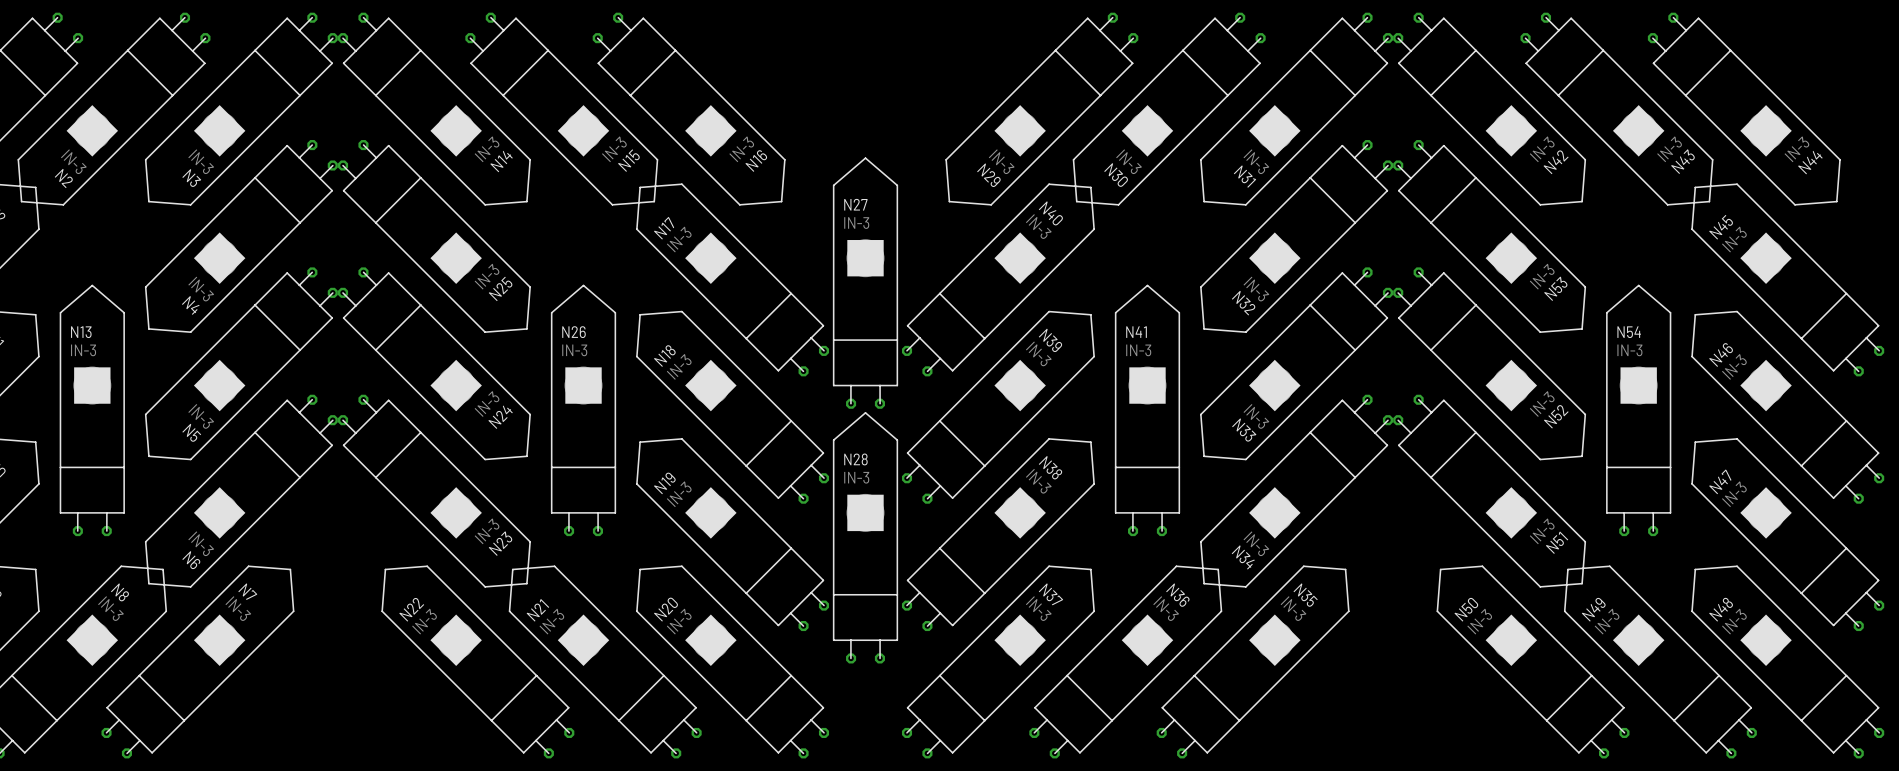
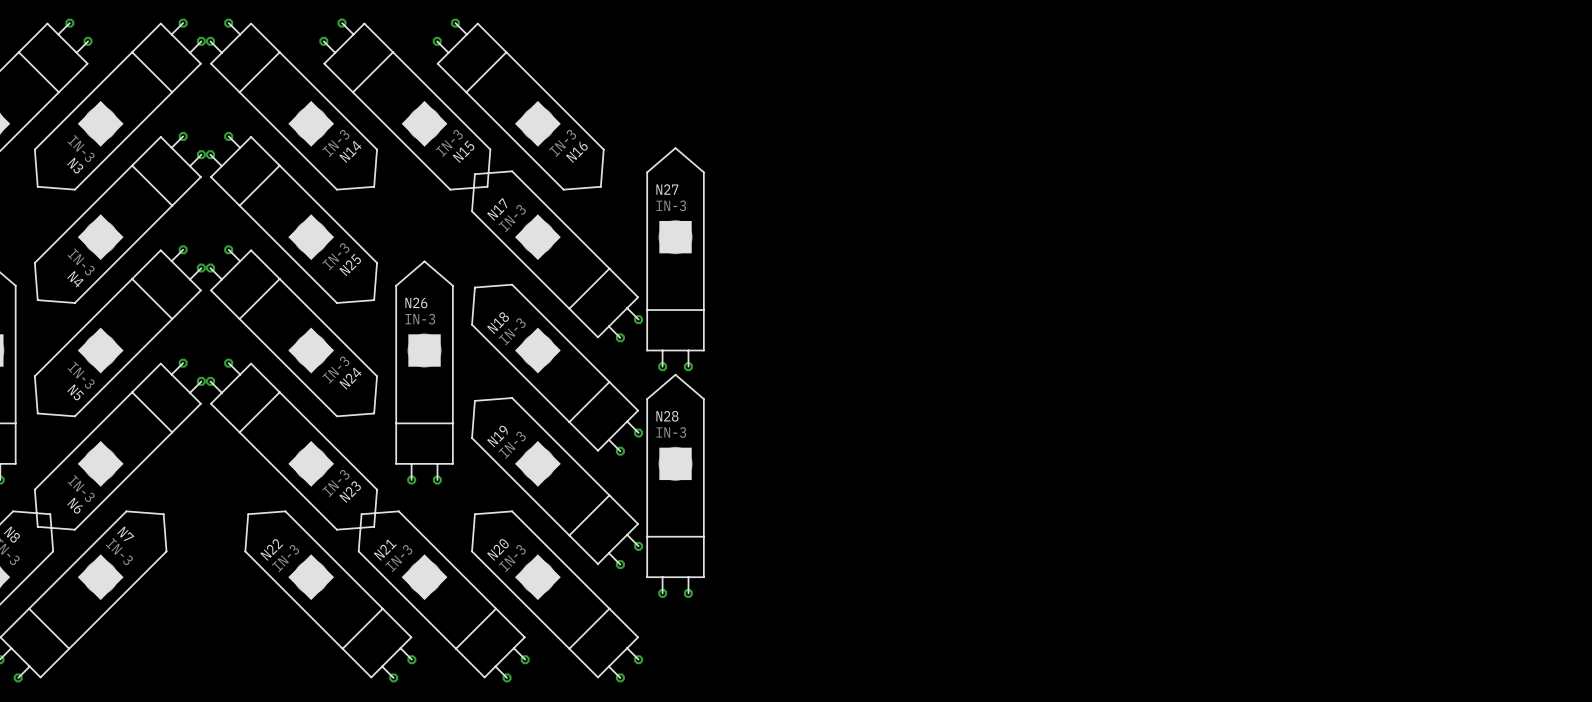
N29: IN-3 (1041, 109) -> none
N30: IN-3 (1169, 109) -> none
N31: IN-3 (1296, 109) -> none
N42: IN-3 (1489, 109) -> none
N43: IN-3 (1616, 109) -> none
N44: IN-3 (1744, 109) -> none
N32: IN-3 (1296, 236) -> none
N53: IN-3 (1489, 236) -> none
N40: IN-3 (998, 280) -> none
N45: IN-3 (1787, 280) -> none
N33: IN-3 (1296, 363) -> none
N52: IN-3 (1489, 363) -> none
N39: IN-3 (998, 407) -> none
N46: IN-3 (1787, 407) -> none
N41: IN-3 (1147, 410) -> none
N54: IN-3 (1638, 410) -> none
N34: IN-3 (1296, 491) -> none
N51: IN-3 (1489, 491) -> none
N38: IN-3 (998, 534) -> none
N47: IN-3 (1787, 534) -> none
N37: IN-3 (998, 662) -> none
N36: IN-3 (1125, 662) -> none
N35: IN-3 (1253, 662) -> none
N50: IN-3 (1533, 662) -> none
N49: IN-3 (1660, 662) -> none
N48: IN-3 (1787, 662) -> none

